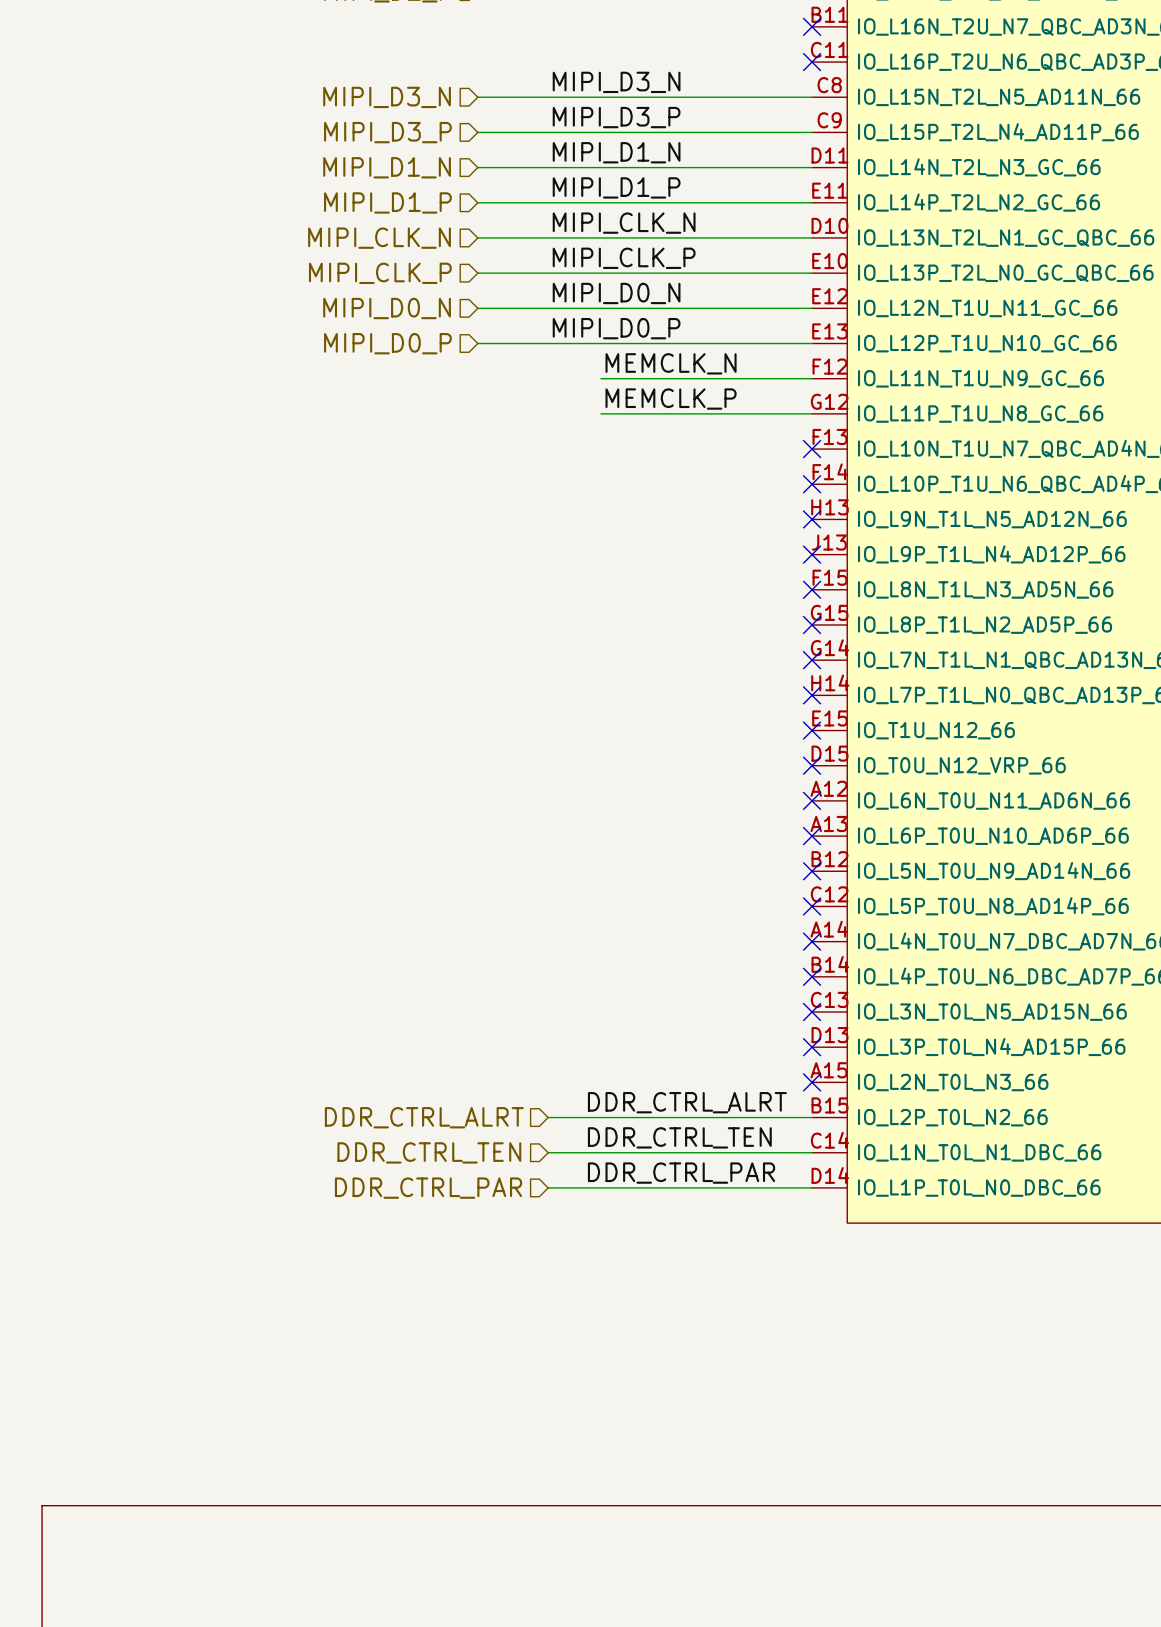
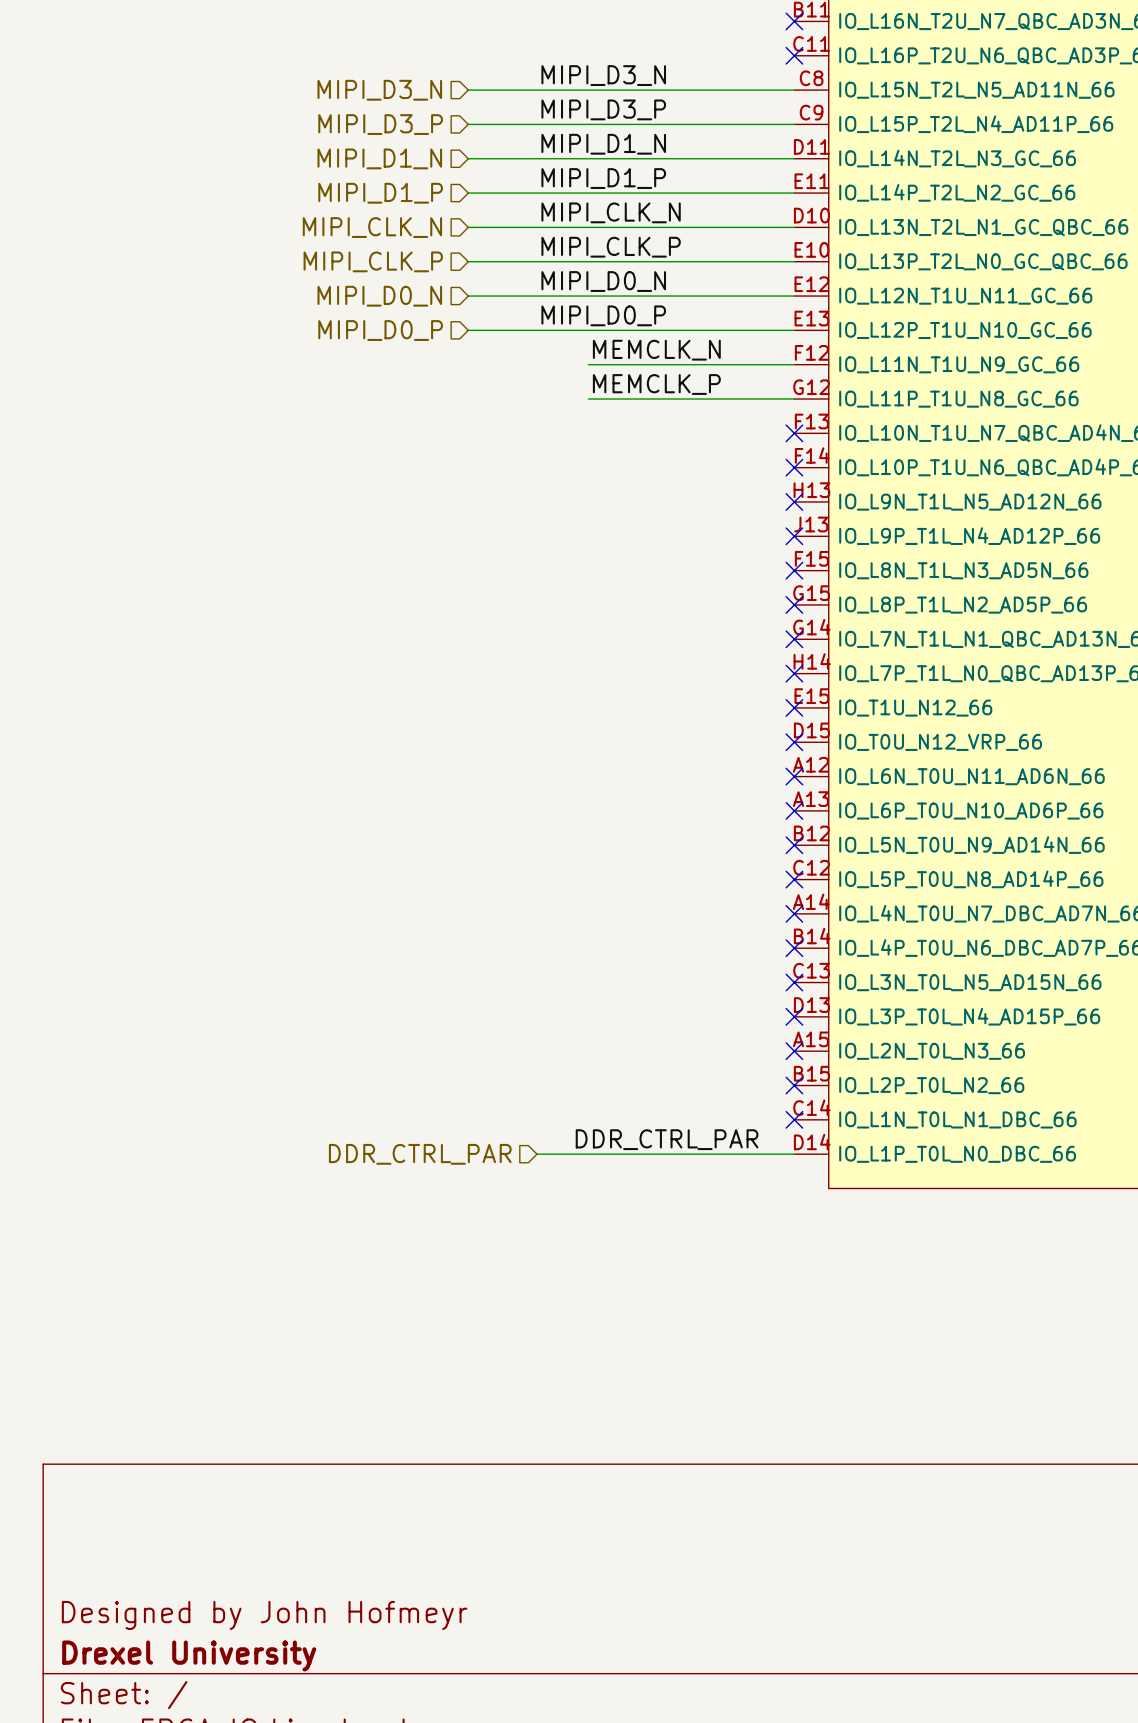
label: DDR_CTRL_ALRT (687, 1102) -> none
hierarchical label: DDR_CTRL_ALRT (424, 1117) -> none
wire: (548, 1117) (812, 1117) -> none
no-connect mark: none -> (794, 1085)
label: DDR_CTRL_TEN (679, 1137) -> none
hierarchical label: DDR_CTRL_TEN (429, 1152) -> none
wire: (548, 1152) (812, 1152) -> none
no-connect mark: none -> (794, 1119)

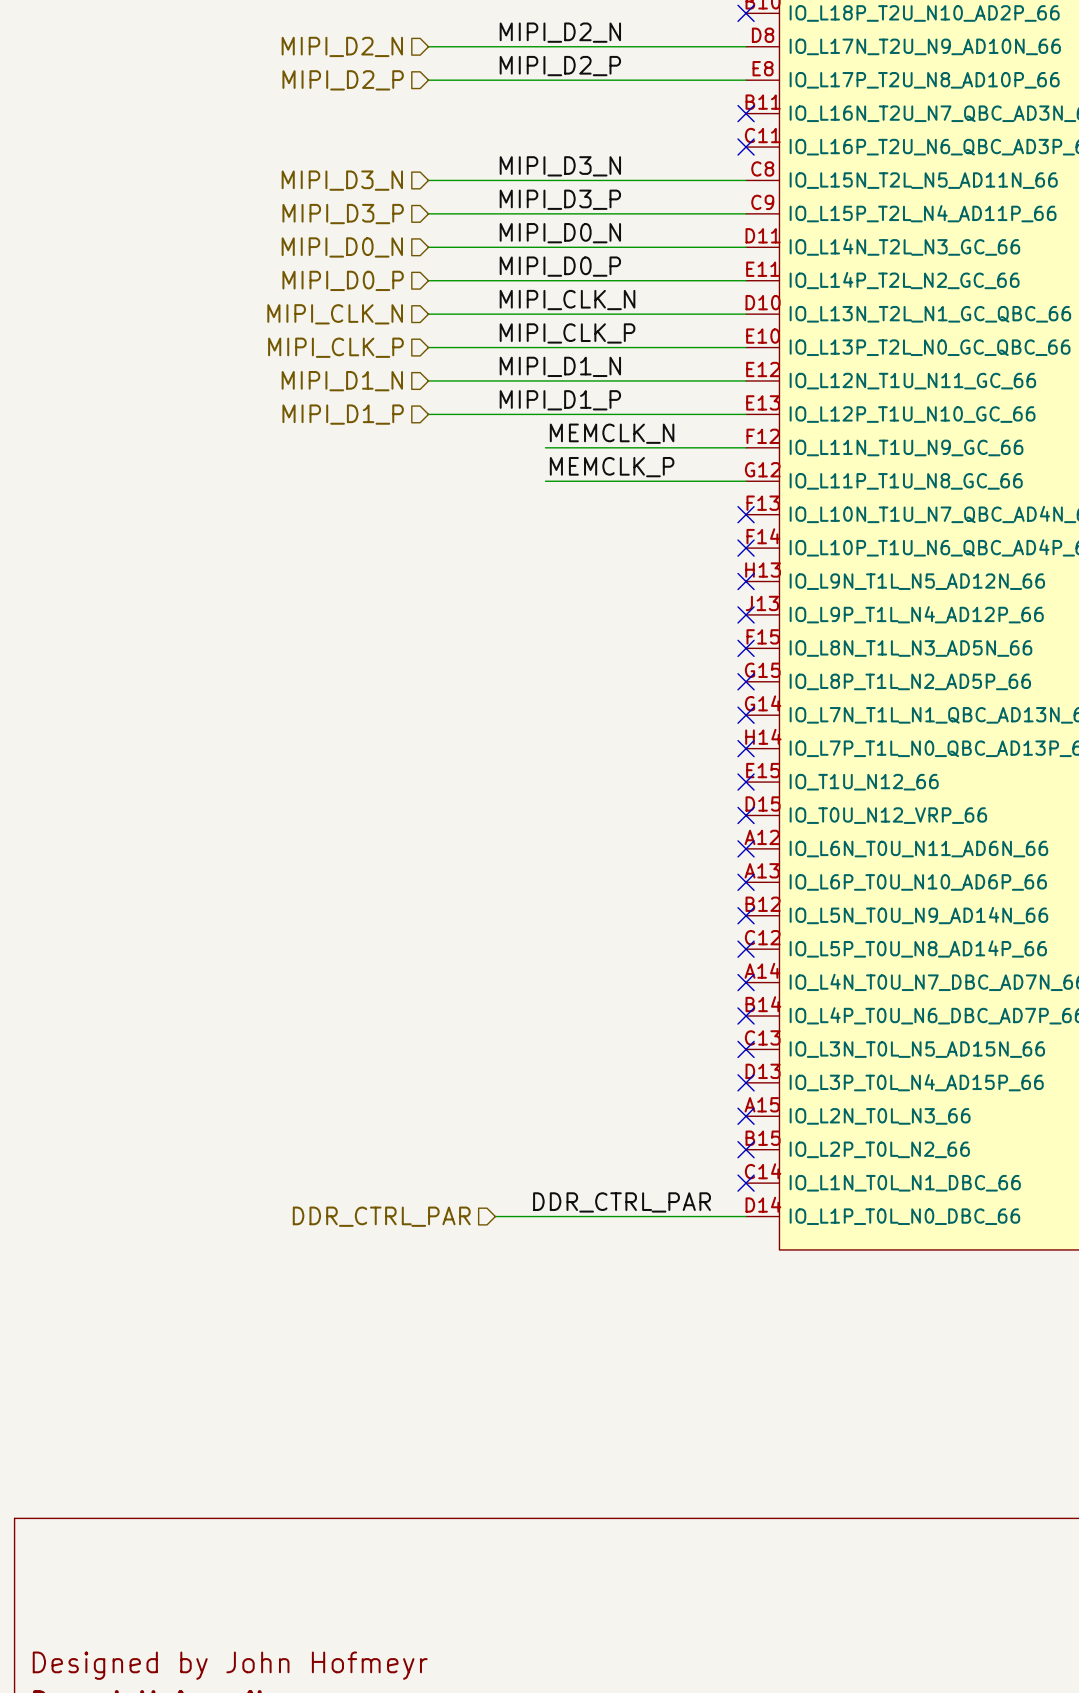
label: MIPI_D1_N (603, 144) -> MIPI_D0_N (560, 233)
hierarchical label: MIPI_D1_N (379, 158) -> MIPI_D0_N (342, 247)
label: MIPI_D1_P (603, 178) -> MIPI_D0_P (560, 266)
hierarchical label: MIPI_D1_P (380, 193) -> MIPI_D0_P (343, 280)
label: MIPI_D0_N (603, 281) -> MIPI_D1_N (560, 366)
hierarchical label: MIPI_D0_N (379, 296) -> MIPI_D1_N (342, 381)
label: MIPI_D0_P (603, 315) -> MIPI_D1_P (560, 400)
hierarchical label: MIPI_D0_P (380, 330) -> MIPI_D1_P (343, 414)

